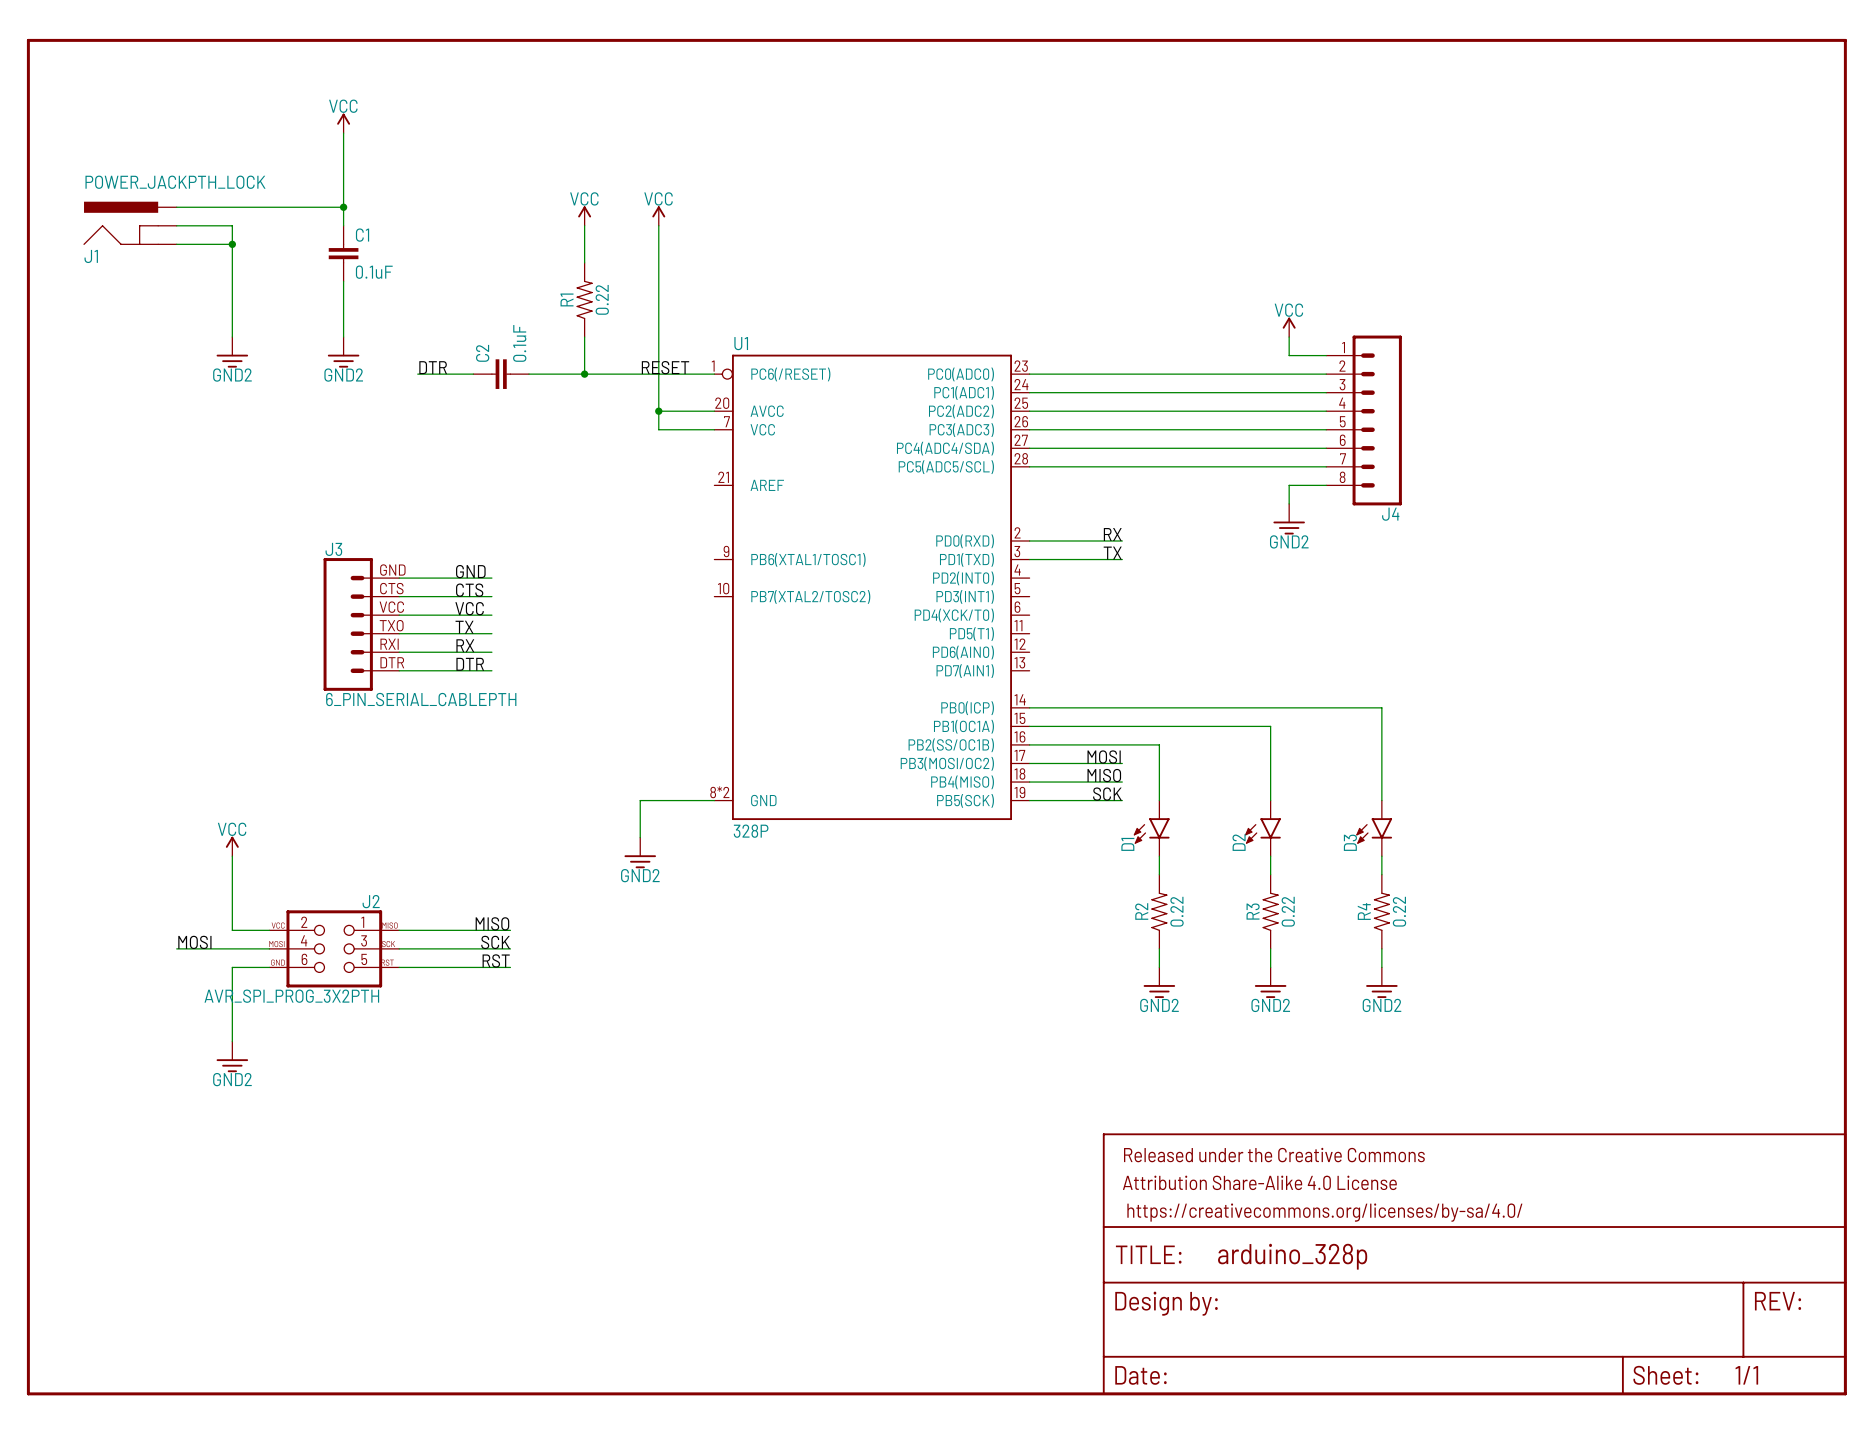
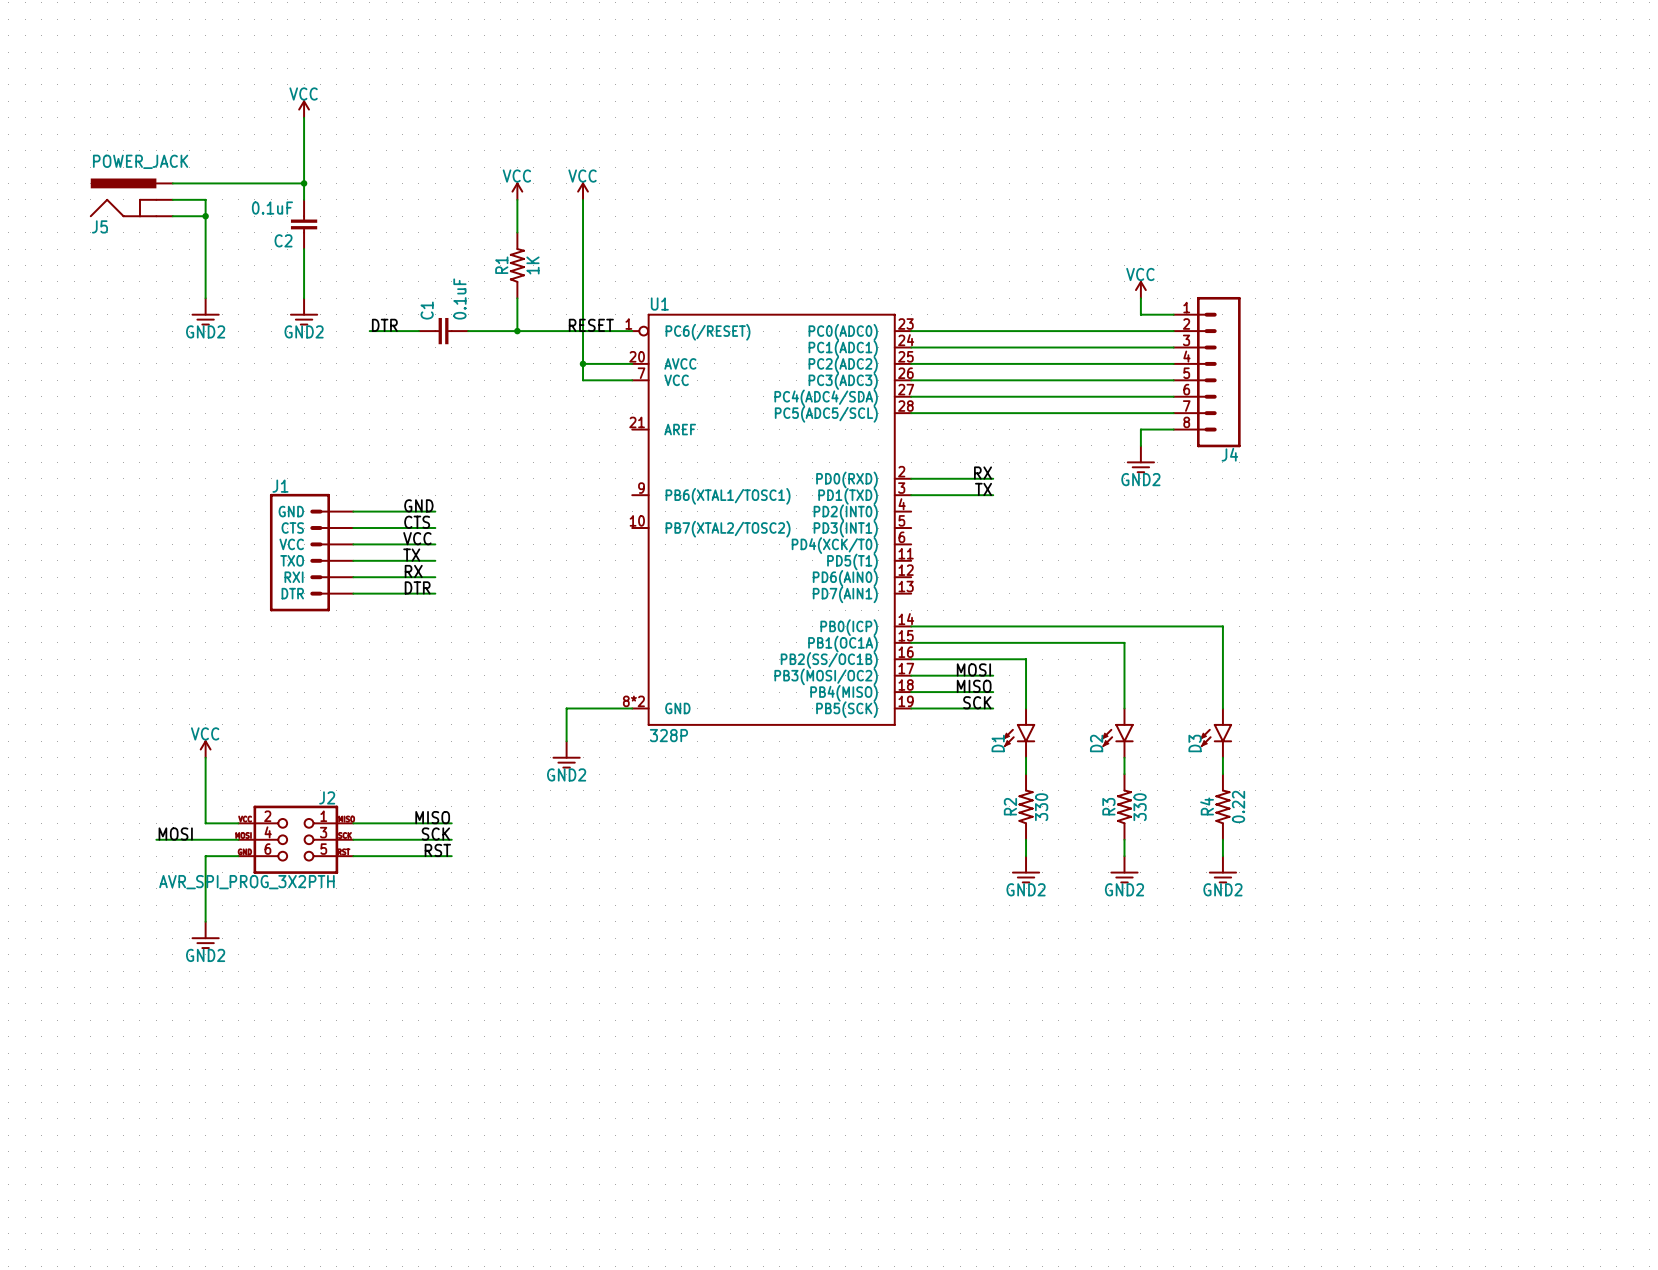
J1 value: POWER_JACKPTH_LOCK (175, 182) -> none
J1 symbol: [83, 201, 177, 245] -> [269, 493, 354, 612]
J5: none -> POWER_JACK (131, 197)
C1 name: C1 (362, 235) -> C2 (283, 240)
J1 name position: J1 (91, 256) -> J1 (280, 486)
C1 value position: 0.1uF (374, 272) -> 0.1uF (272, 208)
R1 value: 0.22 (602, 299) -> 1K (532, 265)
C2 name: C2 (482, 353) -> C1 (427, 310)
J3: 6_PIN_SERIAL_CABLEPTH (361, 624) -> none
part: (936, 717) -> none
R2 value: 0.22 (1177, 911) -> 330 (1041, 807)
R3 value: 0.22 (1288, 911) -> 330 (1140, 807)
part: (1474, 1264) -> none

